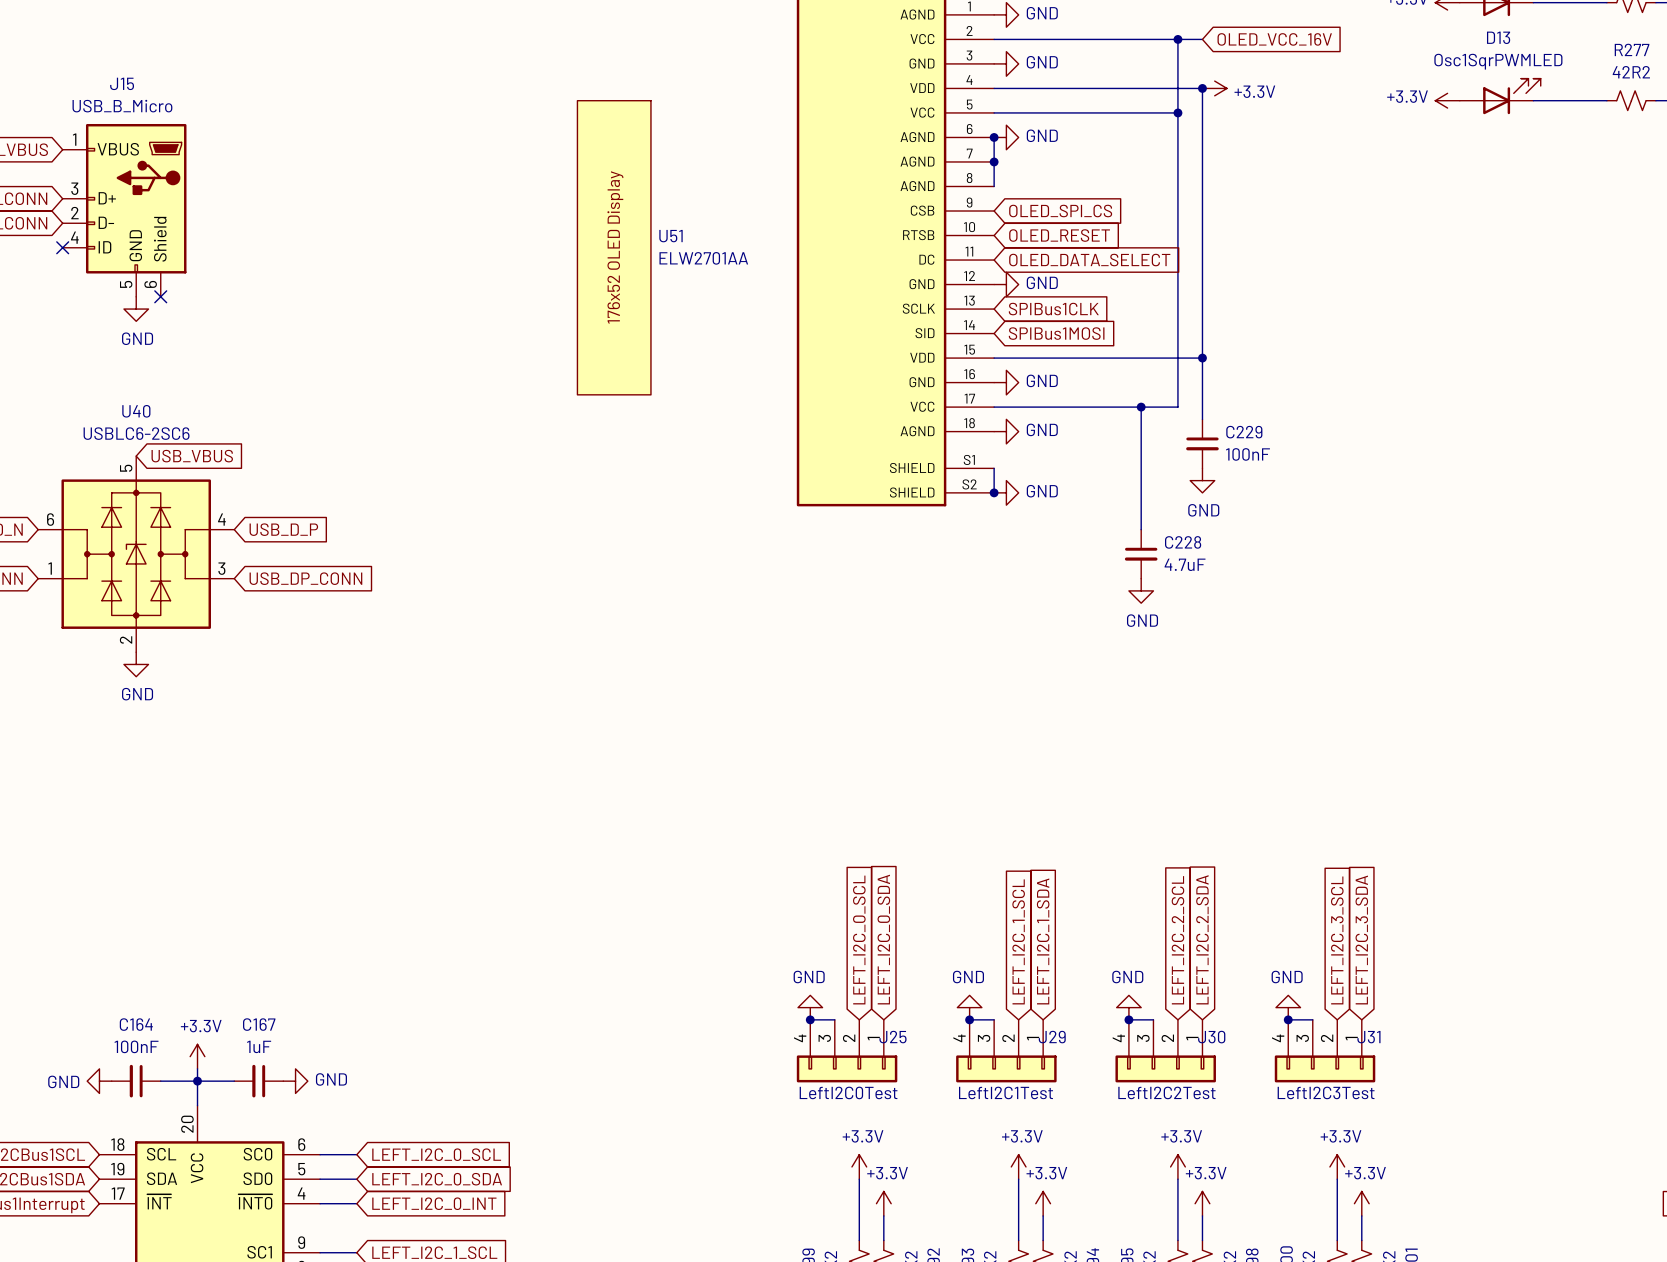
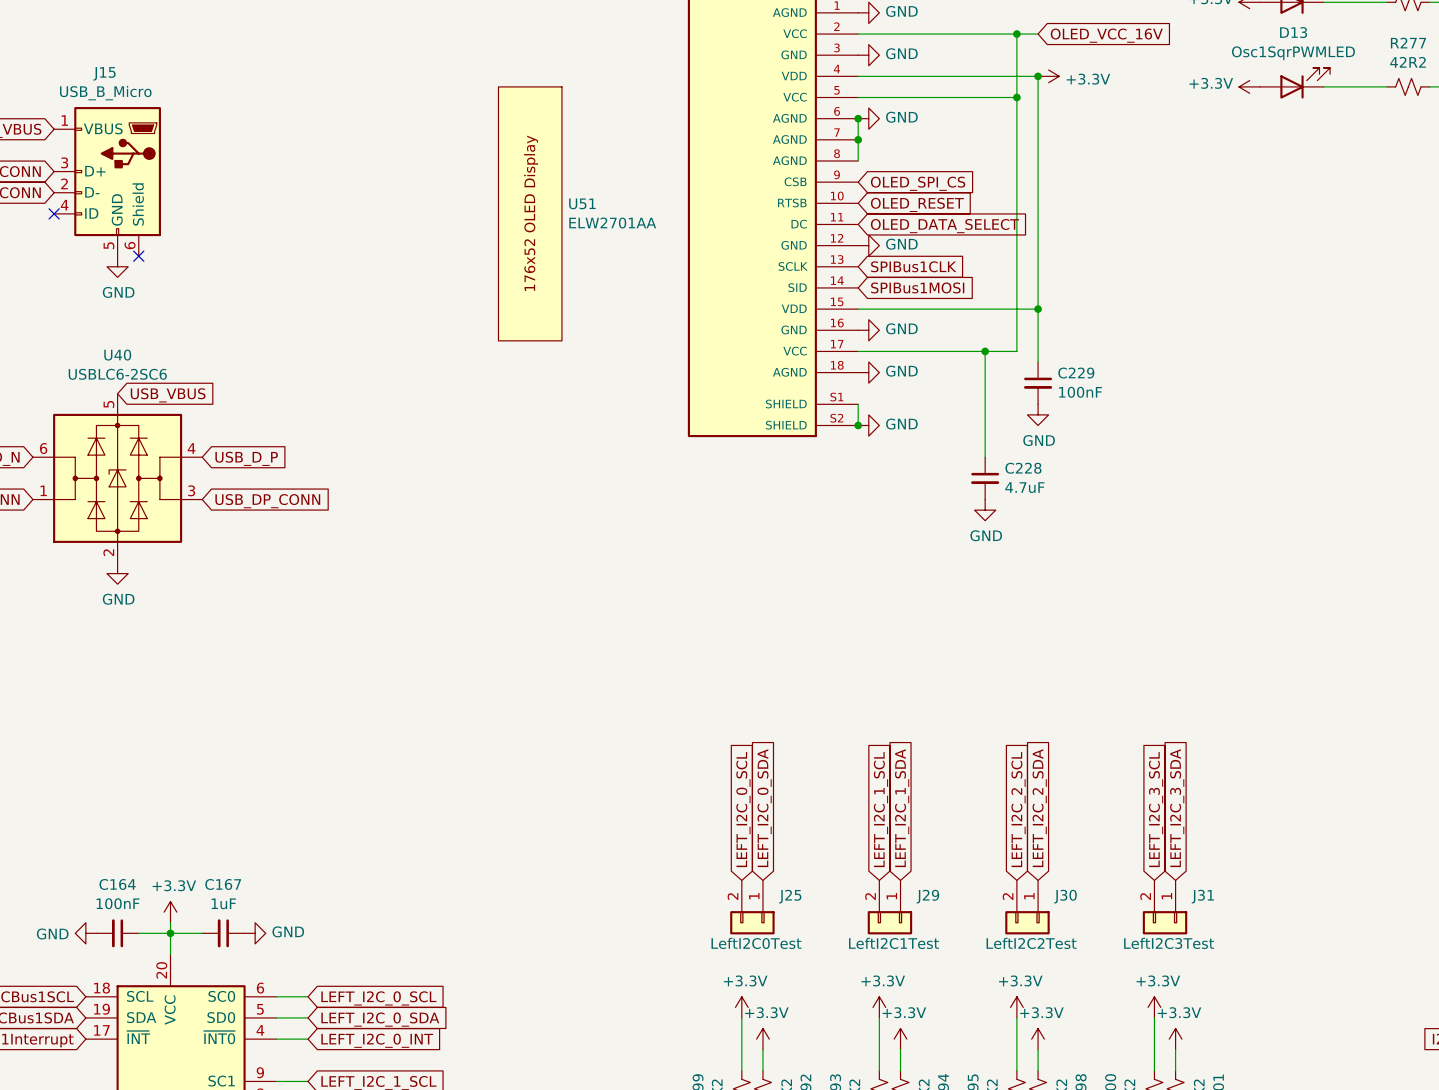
power symbol: GND (810, 1007) -> none
power symbol: GND (969, 1007) -> none
power symbol: GND (1128, 1007) -> none
power symbol: GND (1288, 1007) -> none
J25 symbol: [796, 1019, 898, 1083] -> [730, 880, 775, 935]
wire: (810, 1019) (834, 1019) -> none
junction: (810, 1019) -> none
J29 symbol: [956, 1019, 1057, 1083] -> [867, 880, 913, 935]
wire: (969, 1019) (994, 1019) -> none
junction: (969, 1019) -> none
J30 symbol: [1115, 1019, 1216, 1083] -> [1005, 880, 1050, 935]
wire: (1128, 1019) (1153, 1019) -> none
junction: (1128, 1019) -> none
J31 symbol: [1274, 1019, 1376, 1083] -> [1142, 880, 1188, 935]
wire: (1288, 1019) (1312, 1019) -> none
junction: (1288, 1019) -> none

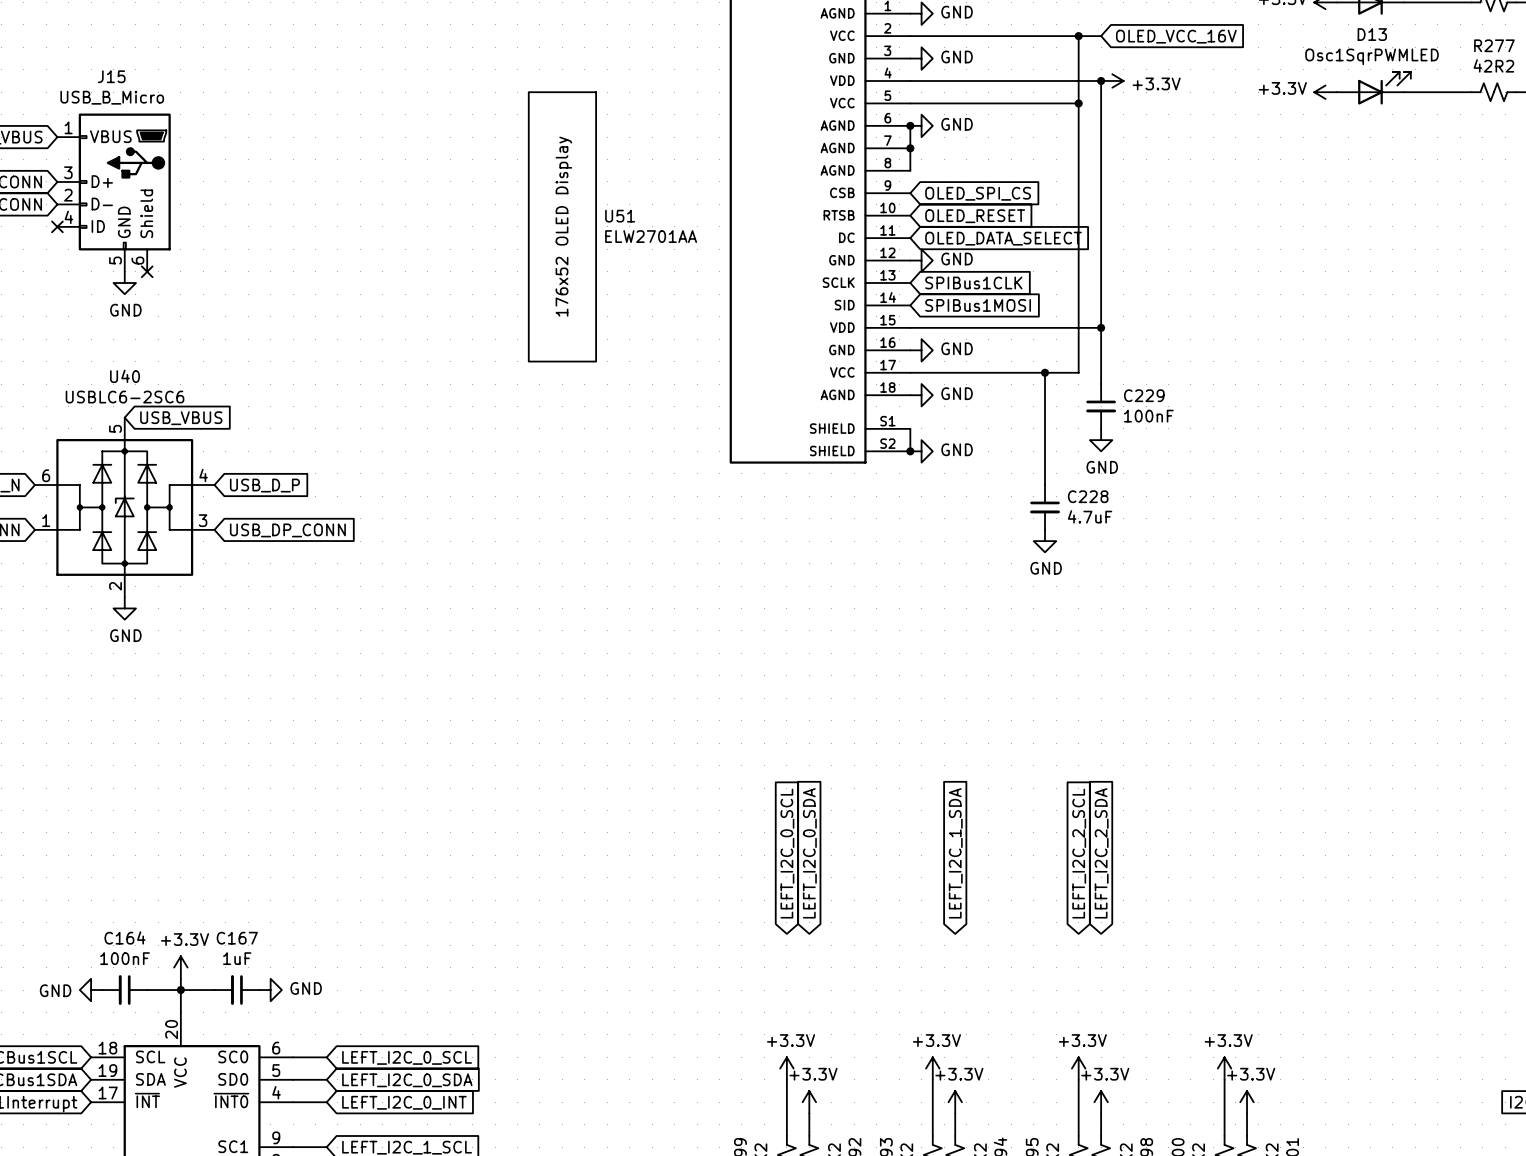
global label: LEFT_I2C_3_SDA (1177, 808) -> none
global label: LEFT_I2C_1_SCL (880, 809) -> none
global label: LEFT_I2C_3_SCL (1156, 809) -> none
J25: LeftI2C0Test (752, 907) -> none
J29: LeftI2C1Test (889, 907) -> none
J30: LeftI2C2Test (1027, 907) -> none
J31: LeftI2C3Test (1165, 907) -> none

